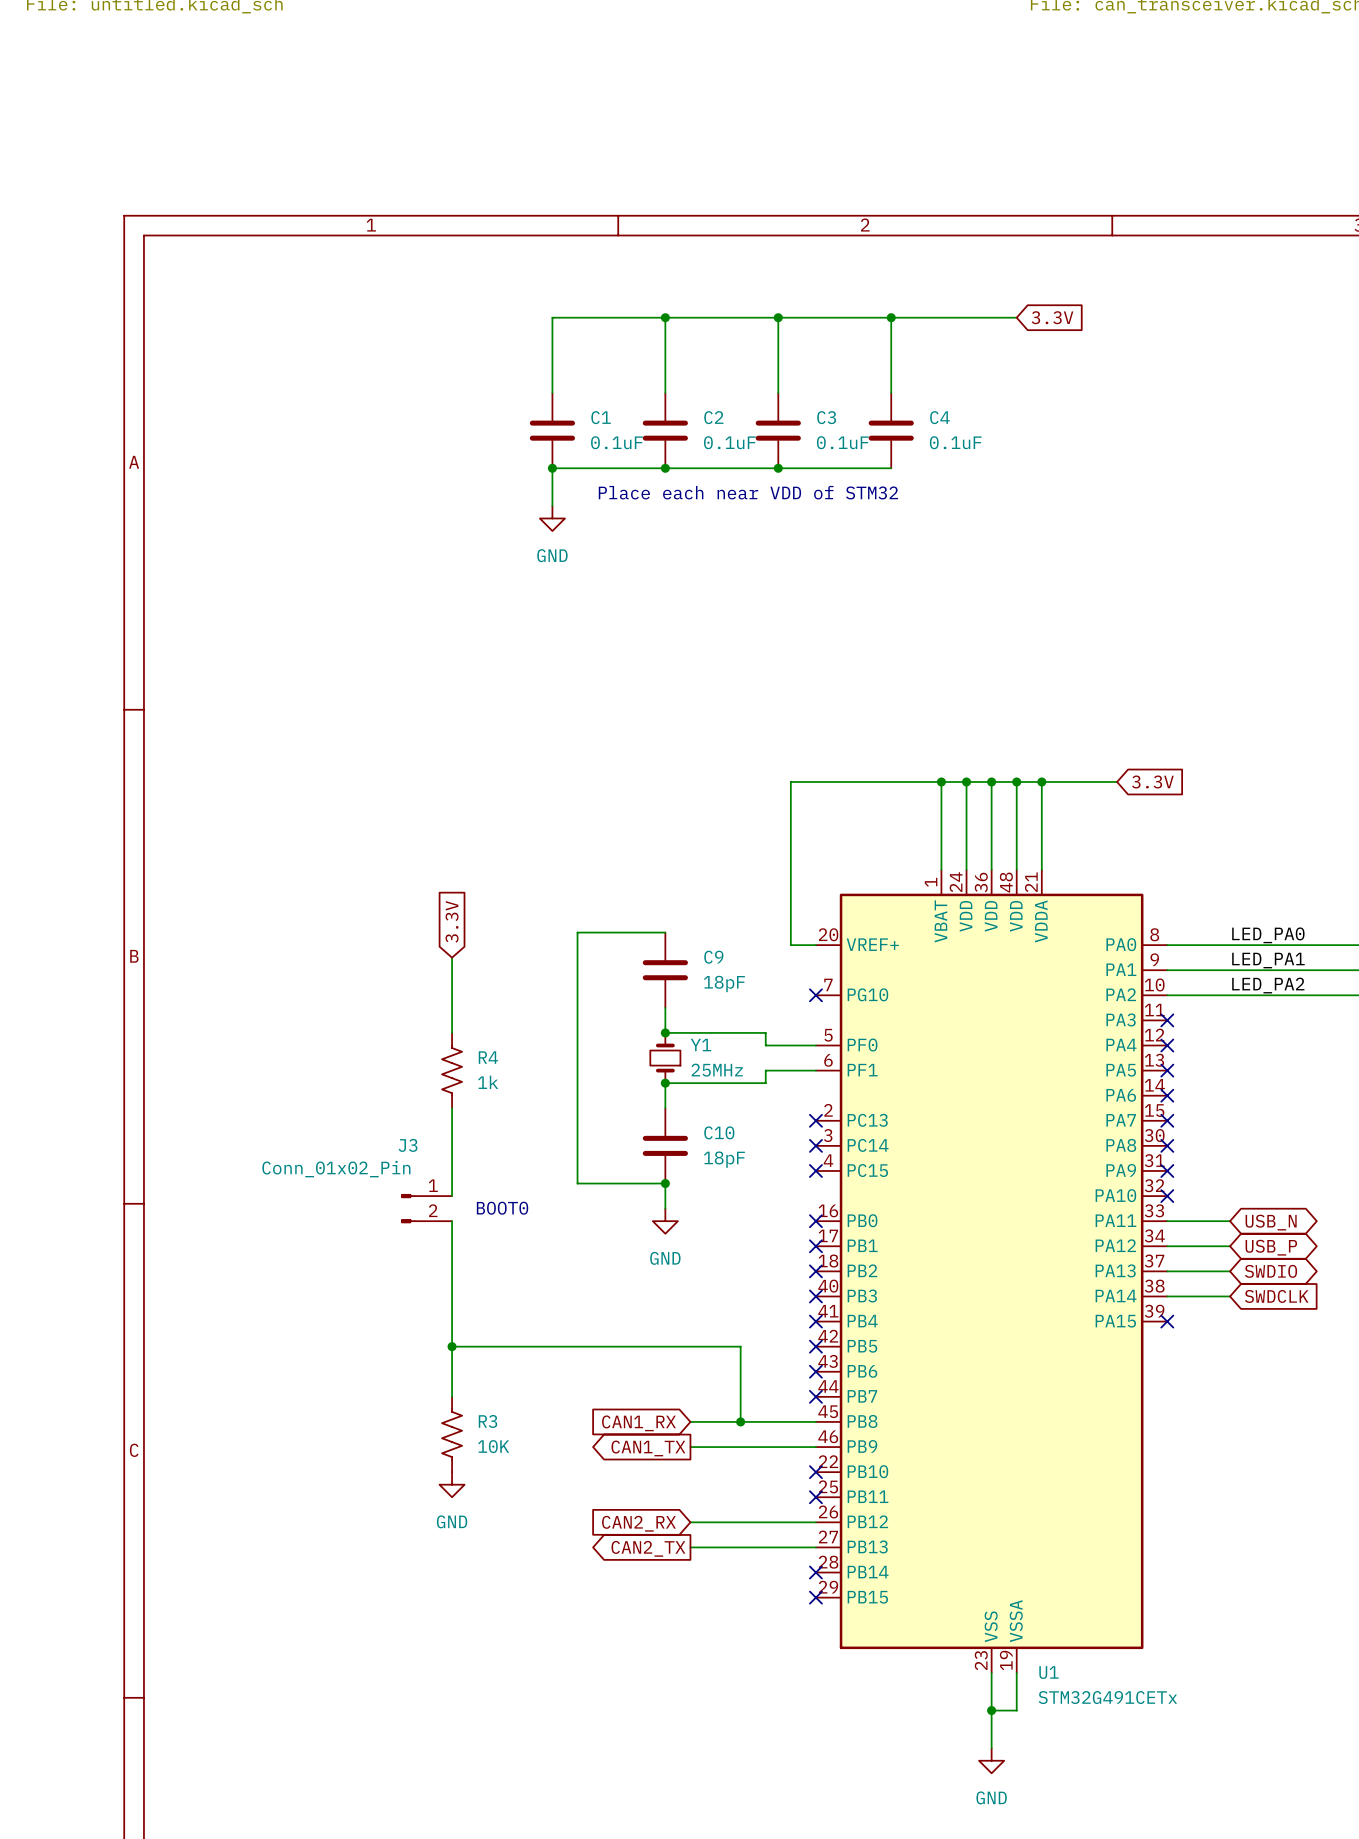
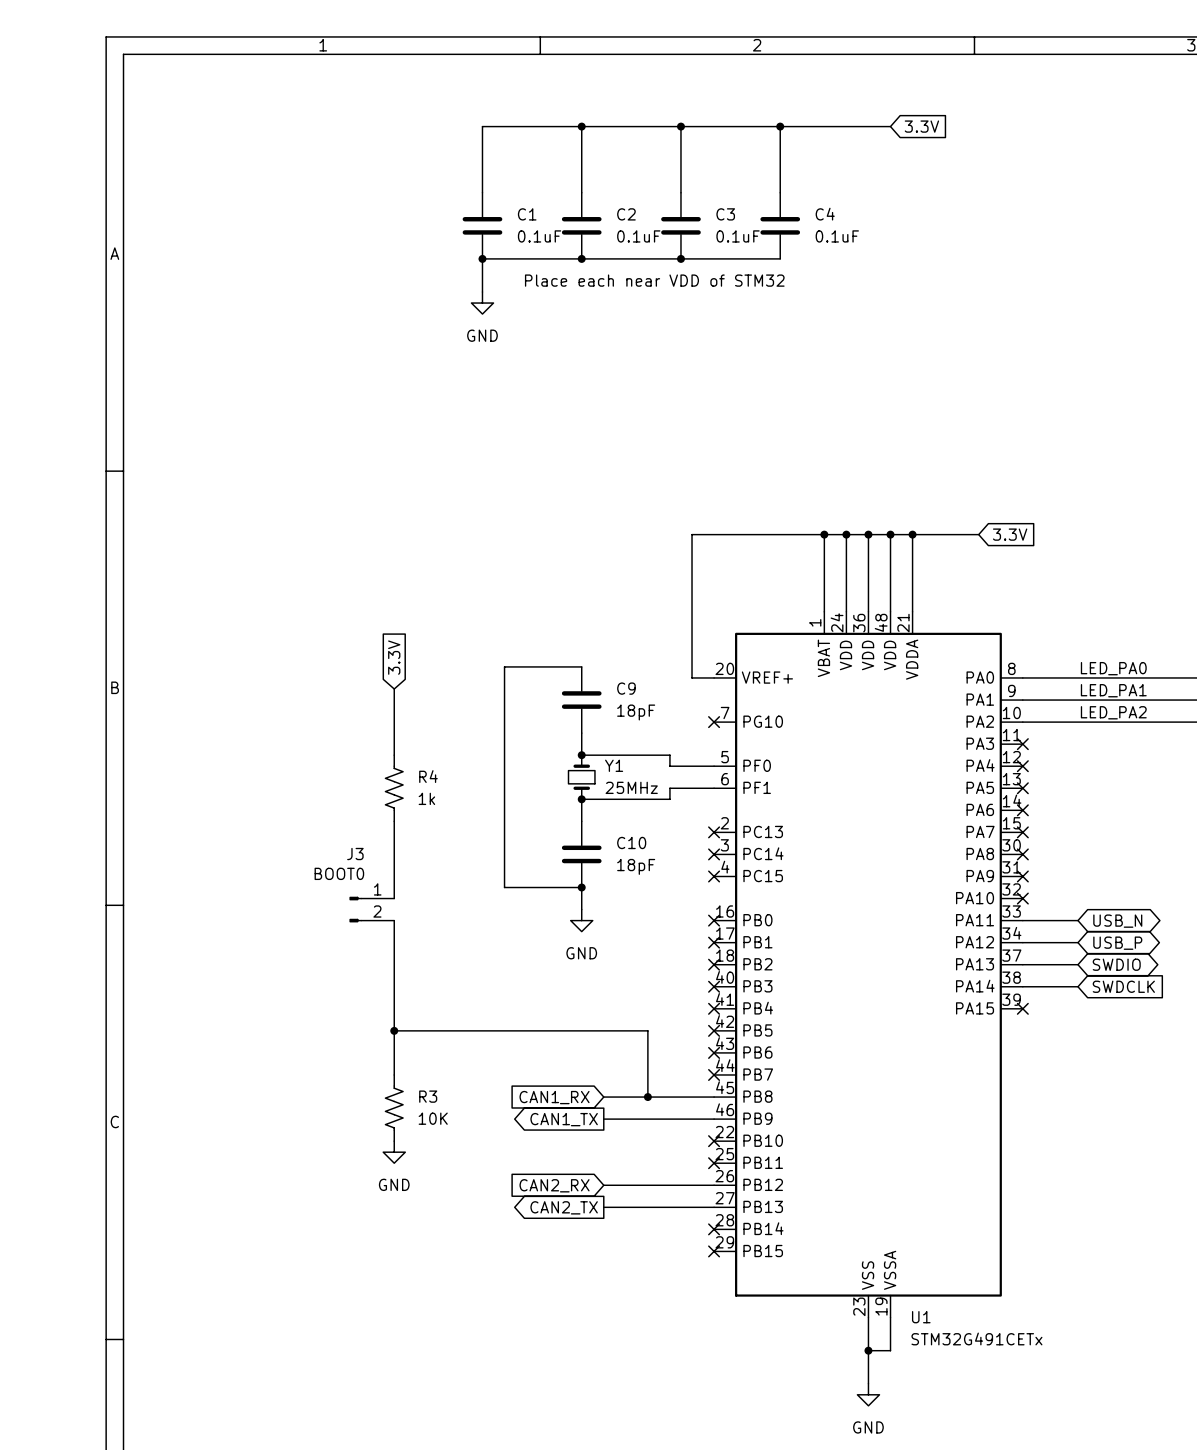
J3 value: Conn_01x02_Pin (336, 1169) -> BOOT0 (339, 873)
text: BOOT0 (502, 1208) -> none

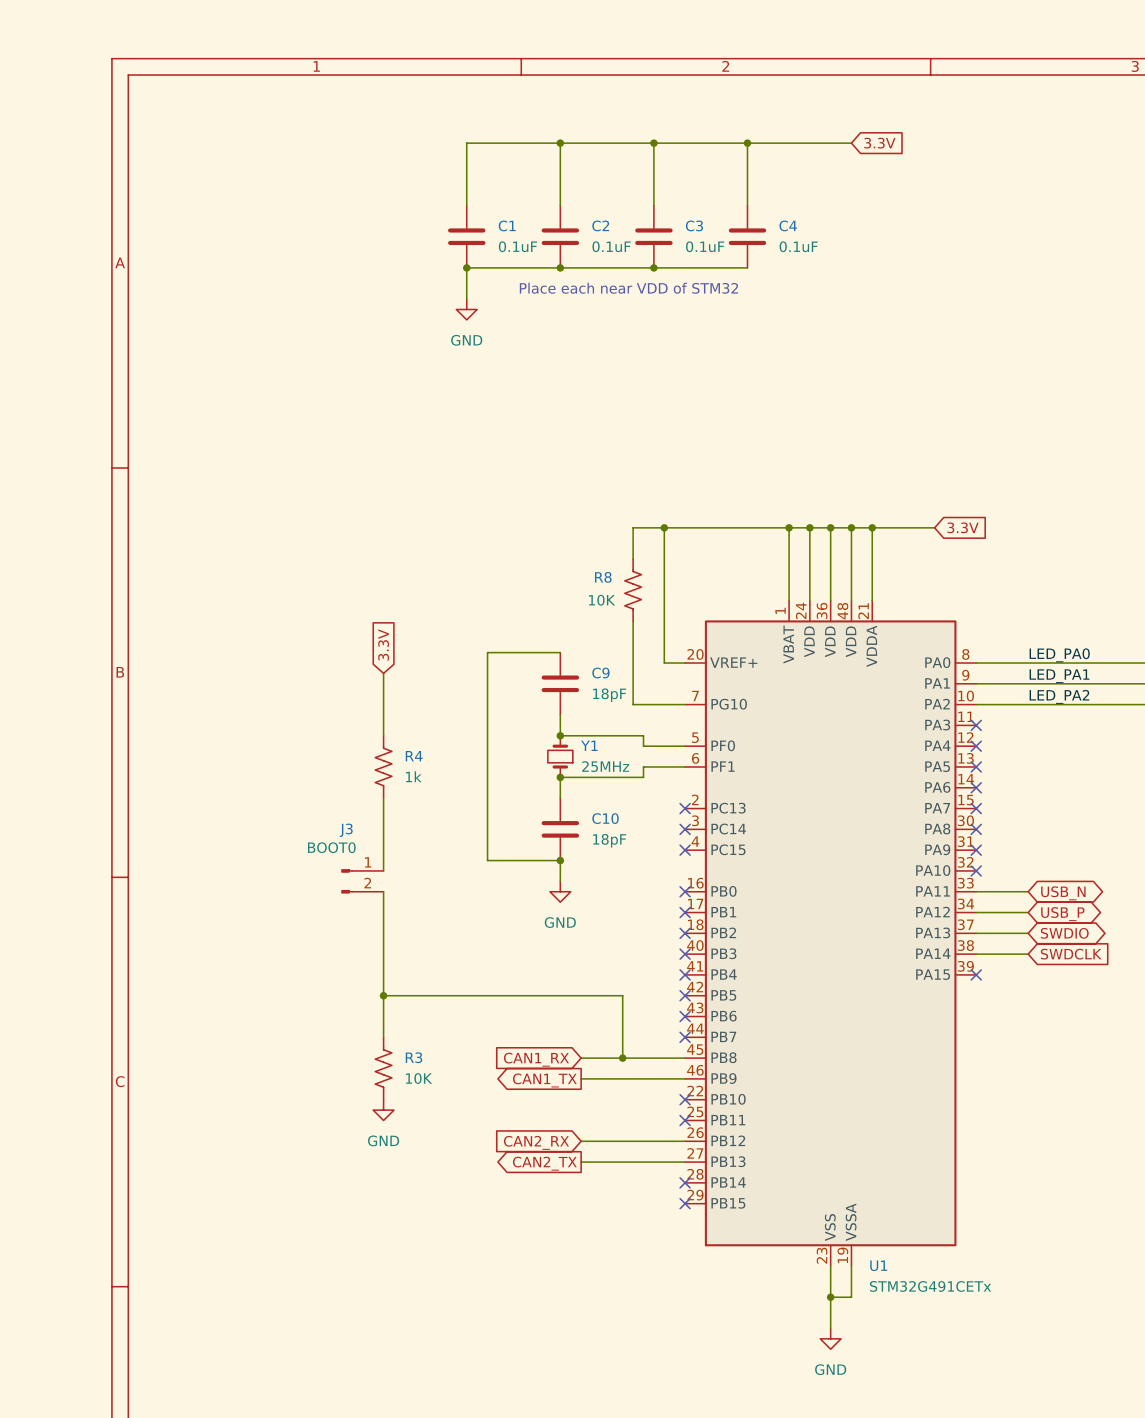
wire: none -> (664, 527) (633, 527) (633, 559)
junction: none -> (664, 527)
R8: none -> 10K (633, 590)
wire: none -> (633, 621) (633, 704) (685, 704)
no-connect mark: (714, 722) -> none

